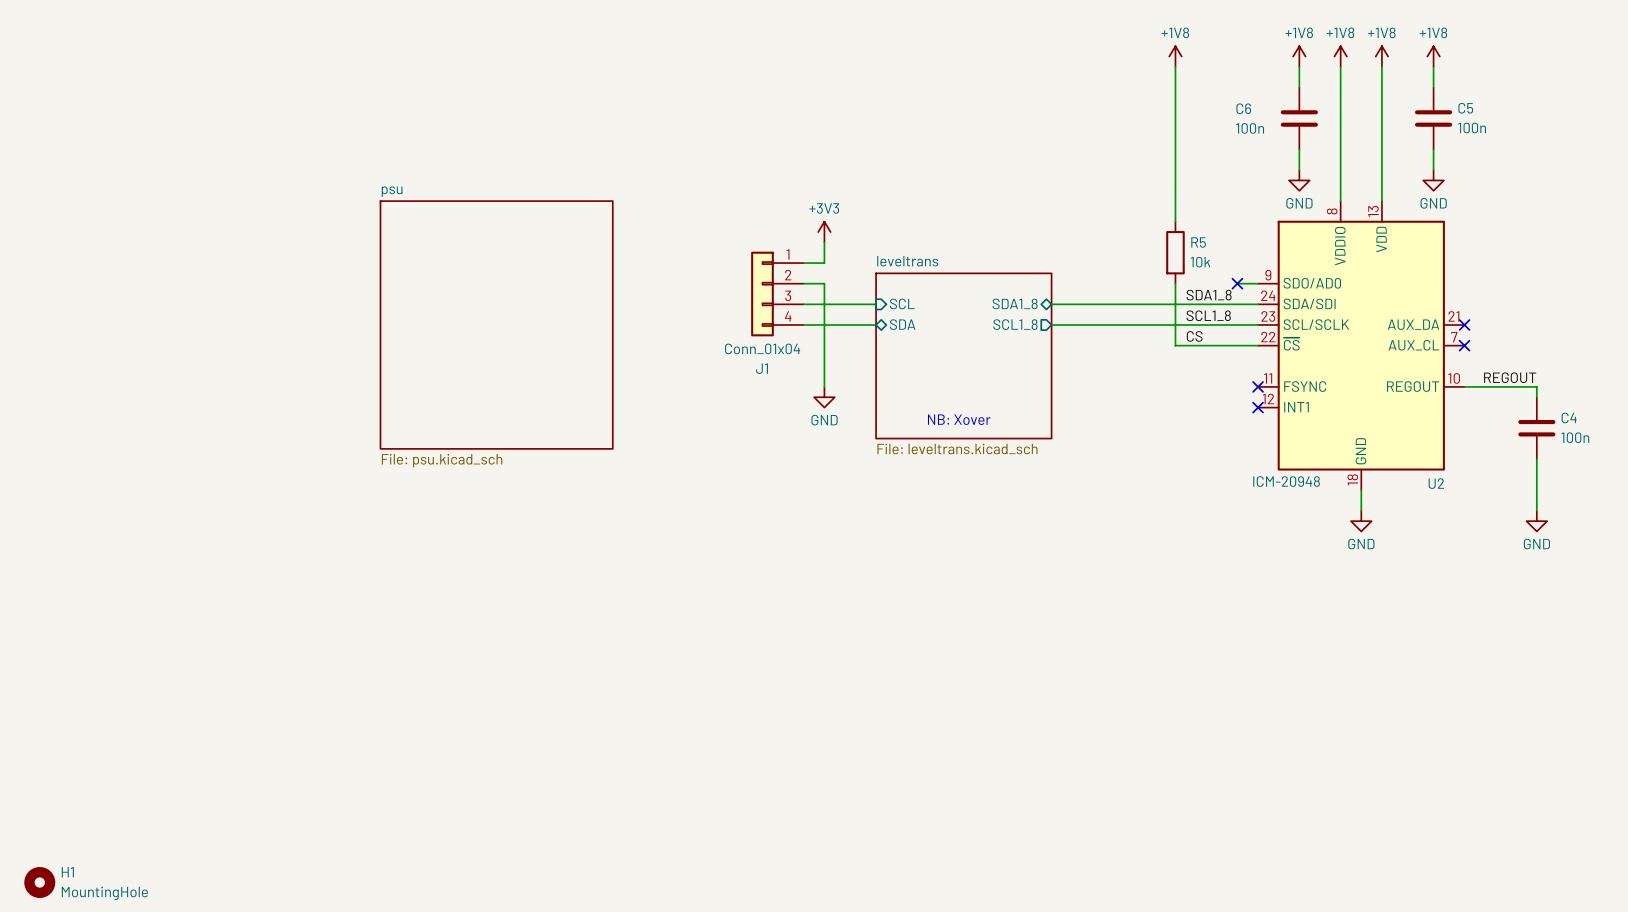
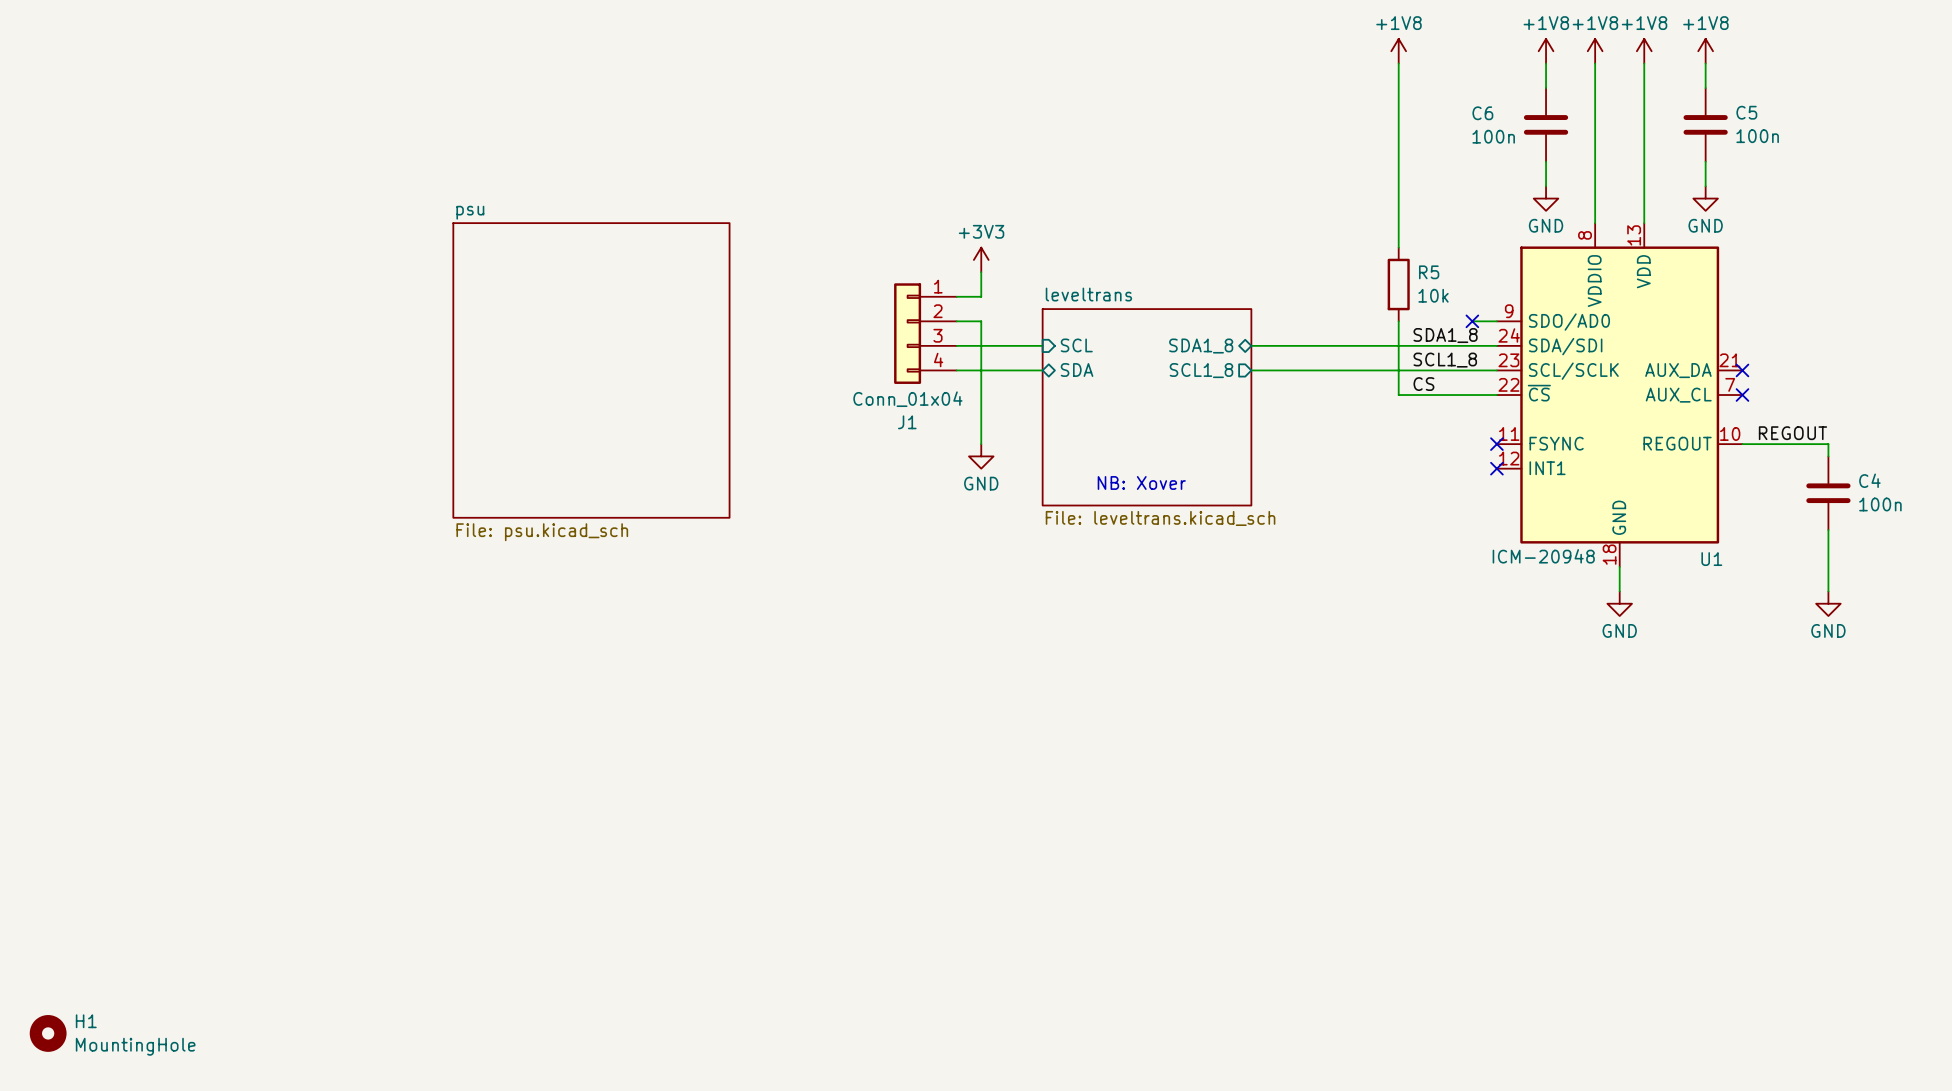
U2 name: U2 (1436, 483) -> U1 (1711, 559)

